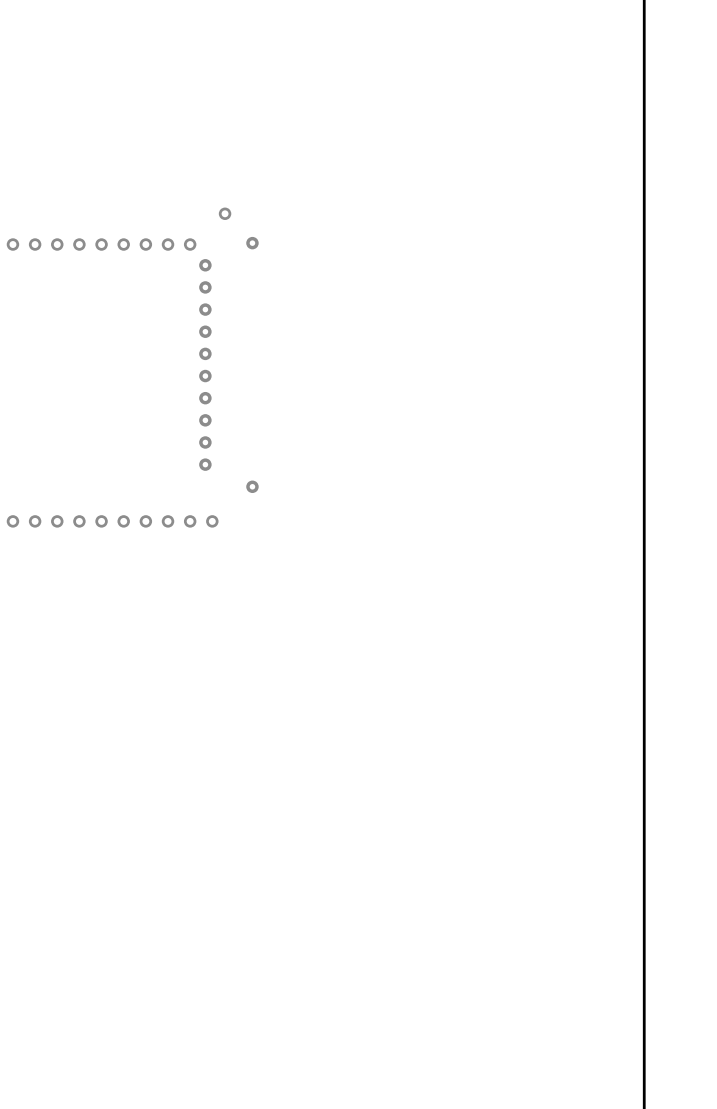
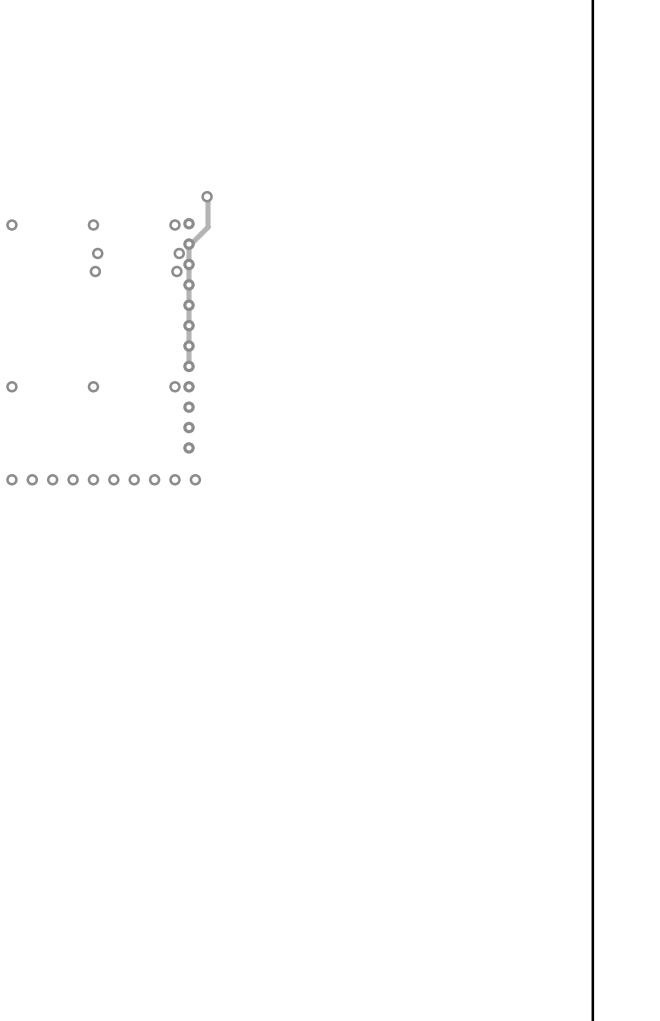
track: none -> (208, 193) (208, 227) (188, 247)
via position: (252, 243) -> (188, 223)
via: (35, 244) -> none
via: (57, 244) -> none
via: (79, 244) -> none
via: (123, 244) -> none
via: (145, 244) -> none
via: (168, 244) -> none
track: none -> (188, 240) (188, 369)
via: none -> (97, 253)
via: none -> (179, 253)
via: none -> (95, 271)
via: none -> (176, 271)
via: none -> (11, 386)
via: none -> (93, 386)
via: none -> (174, 386)
via position: (252, 486) -> (188, 447)

